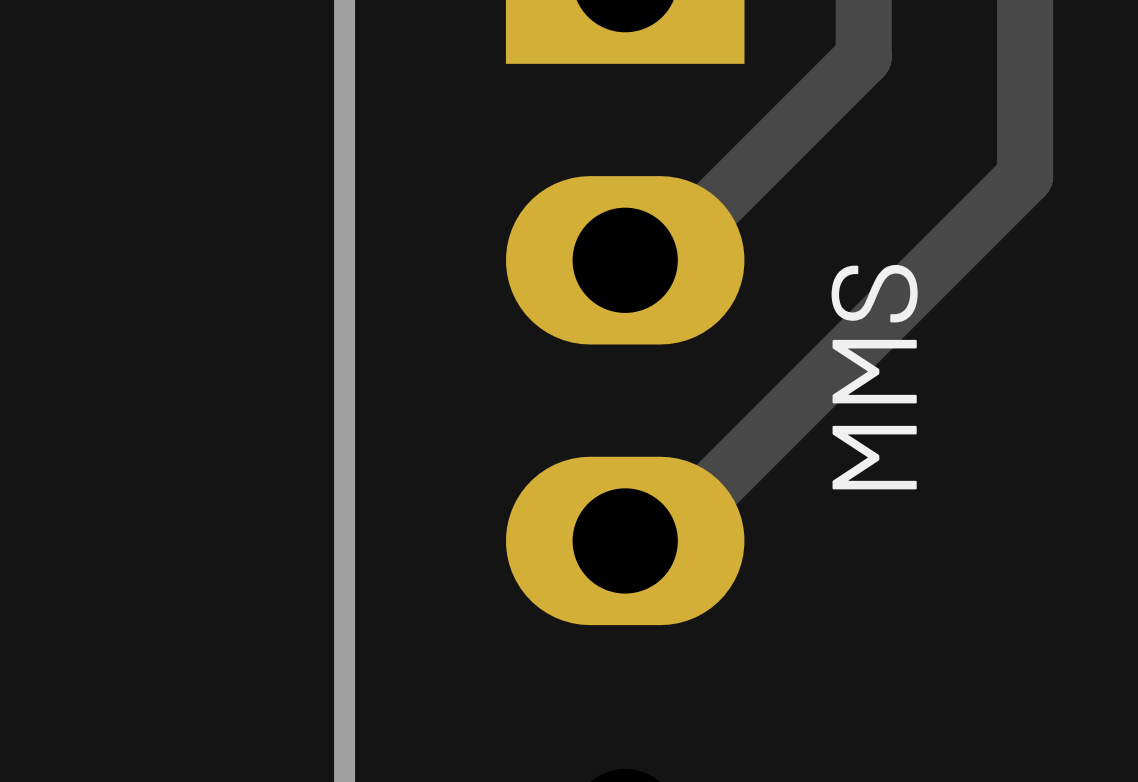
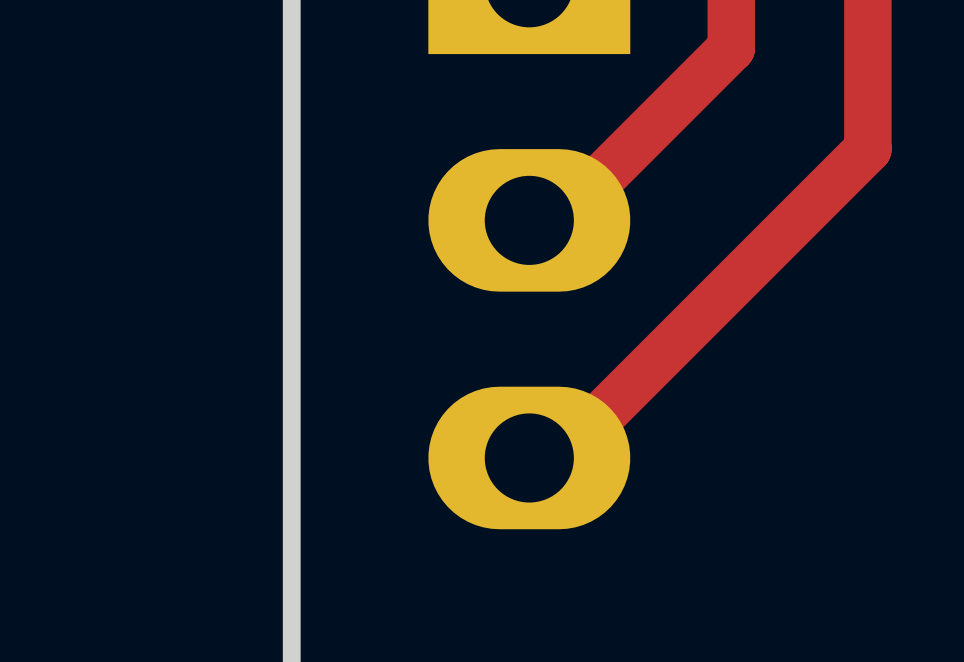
text: MMS (874, 377) -> none

